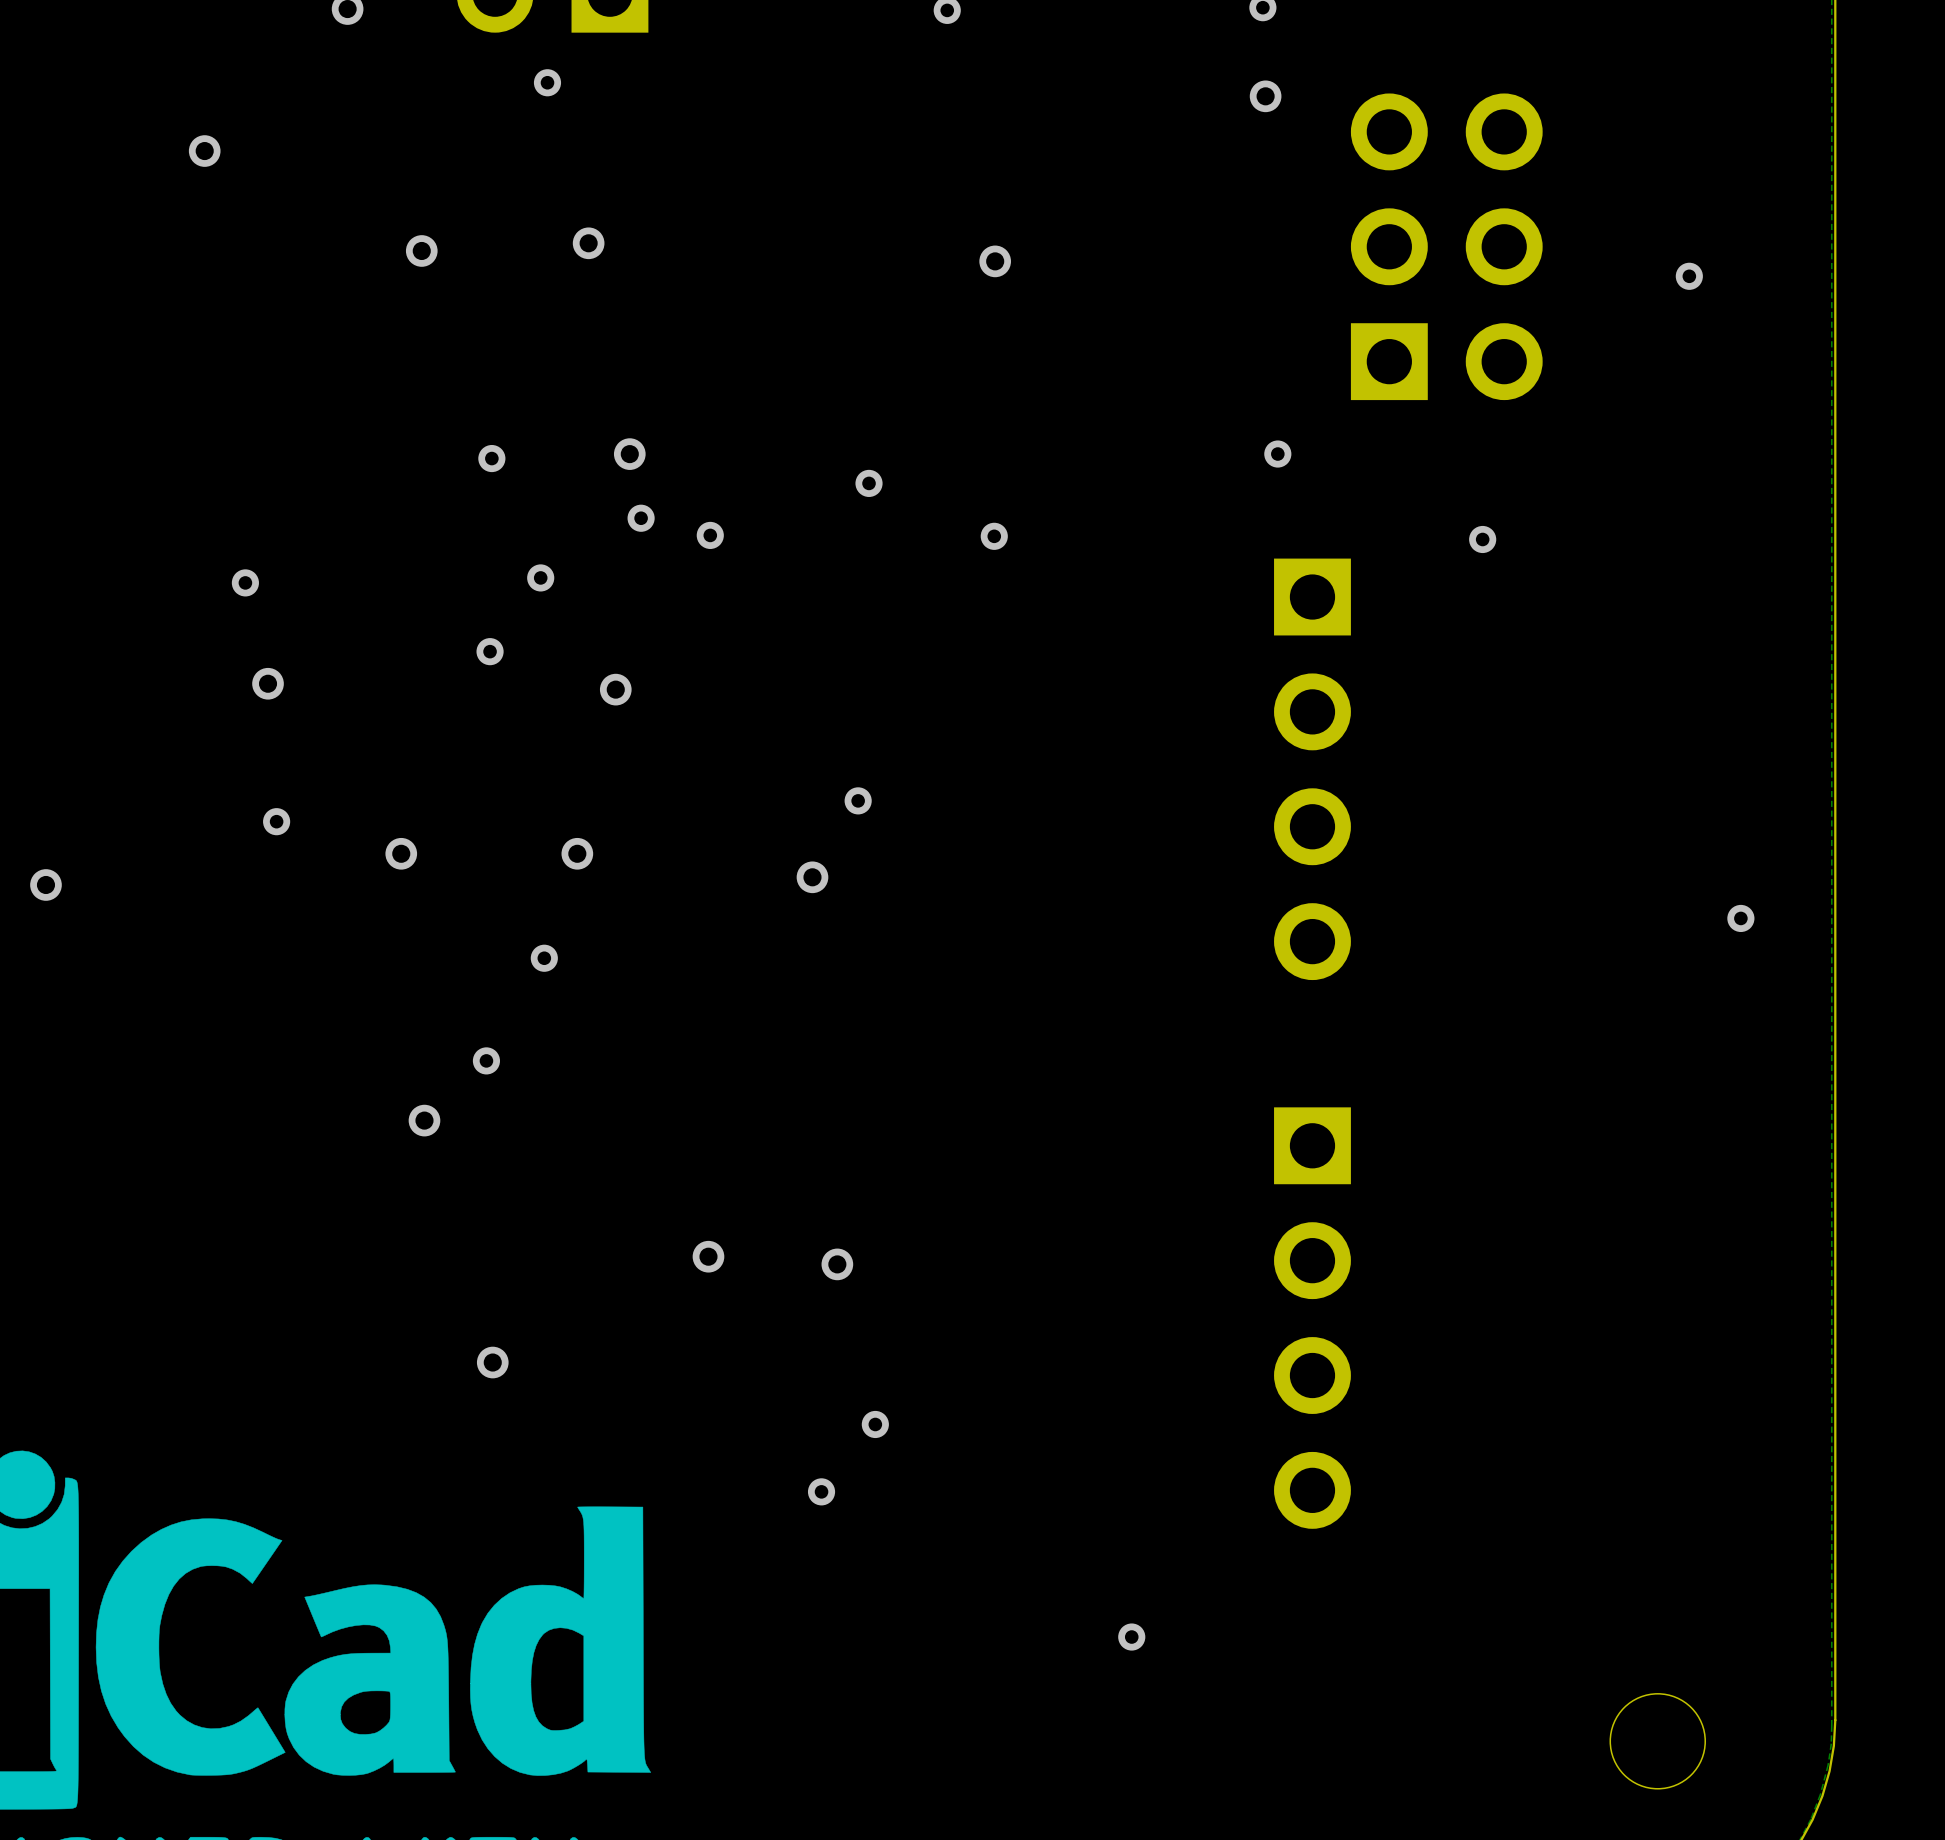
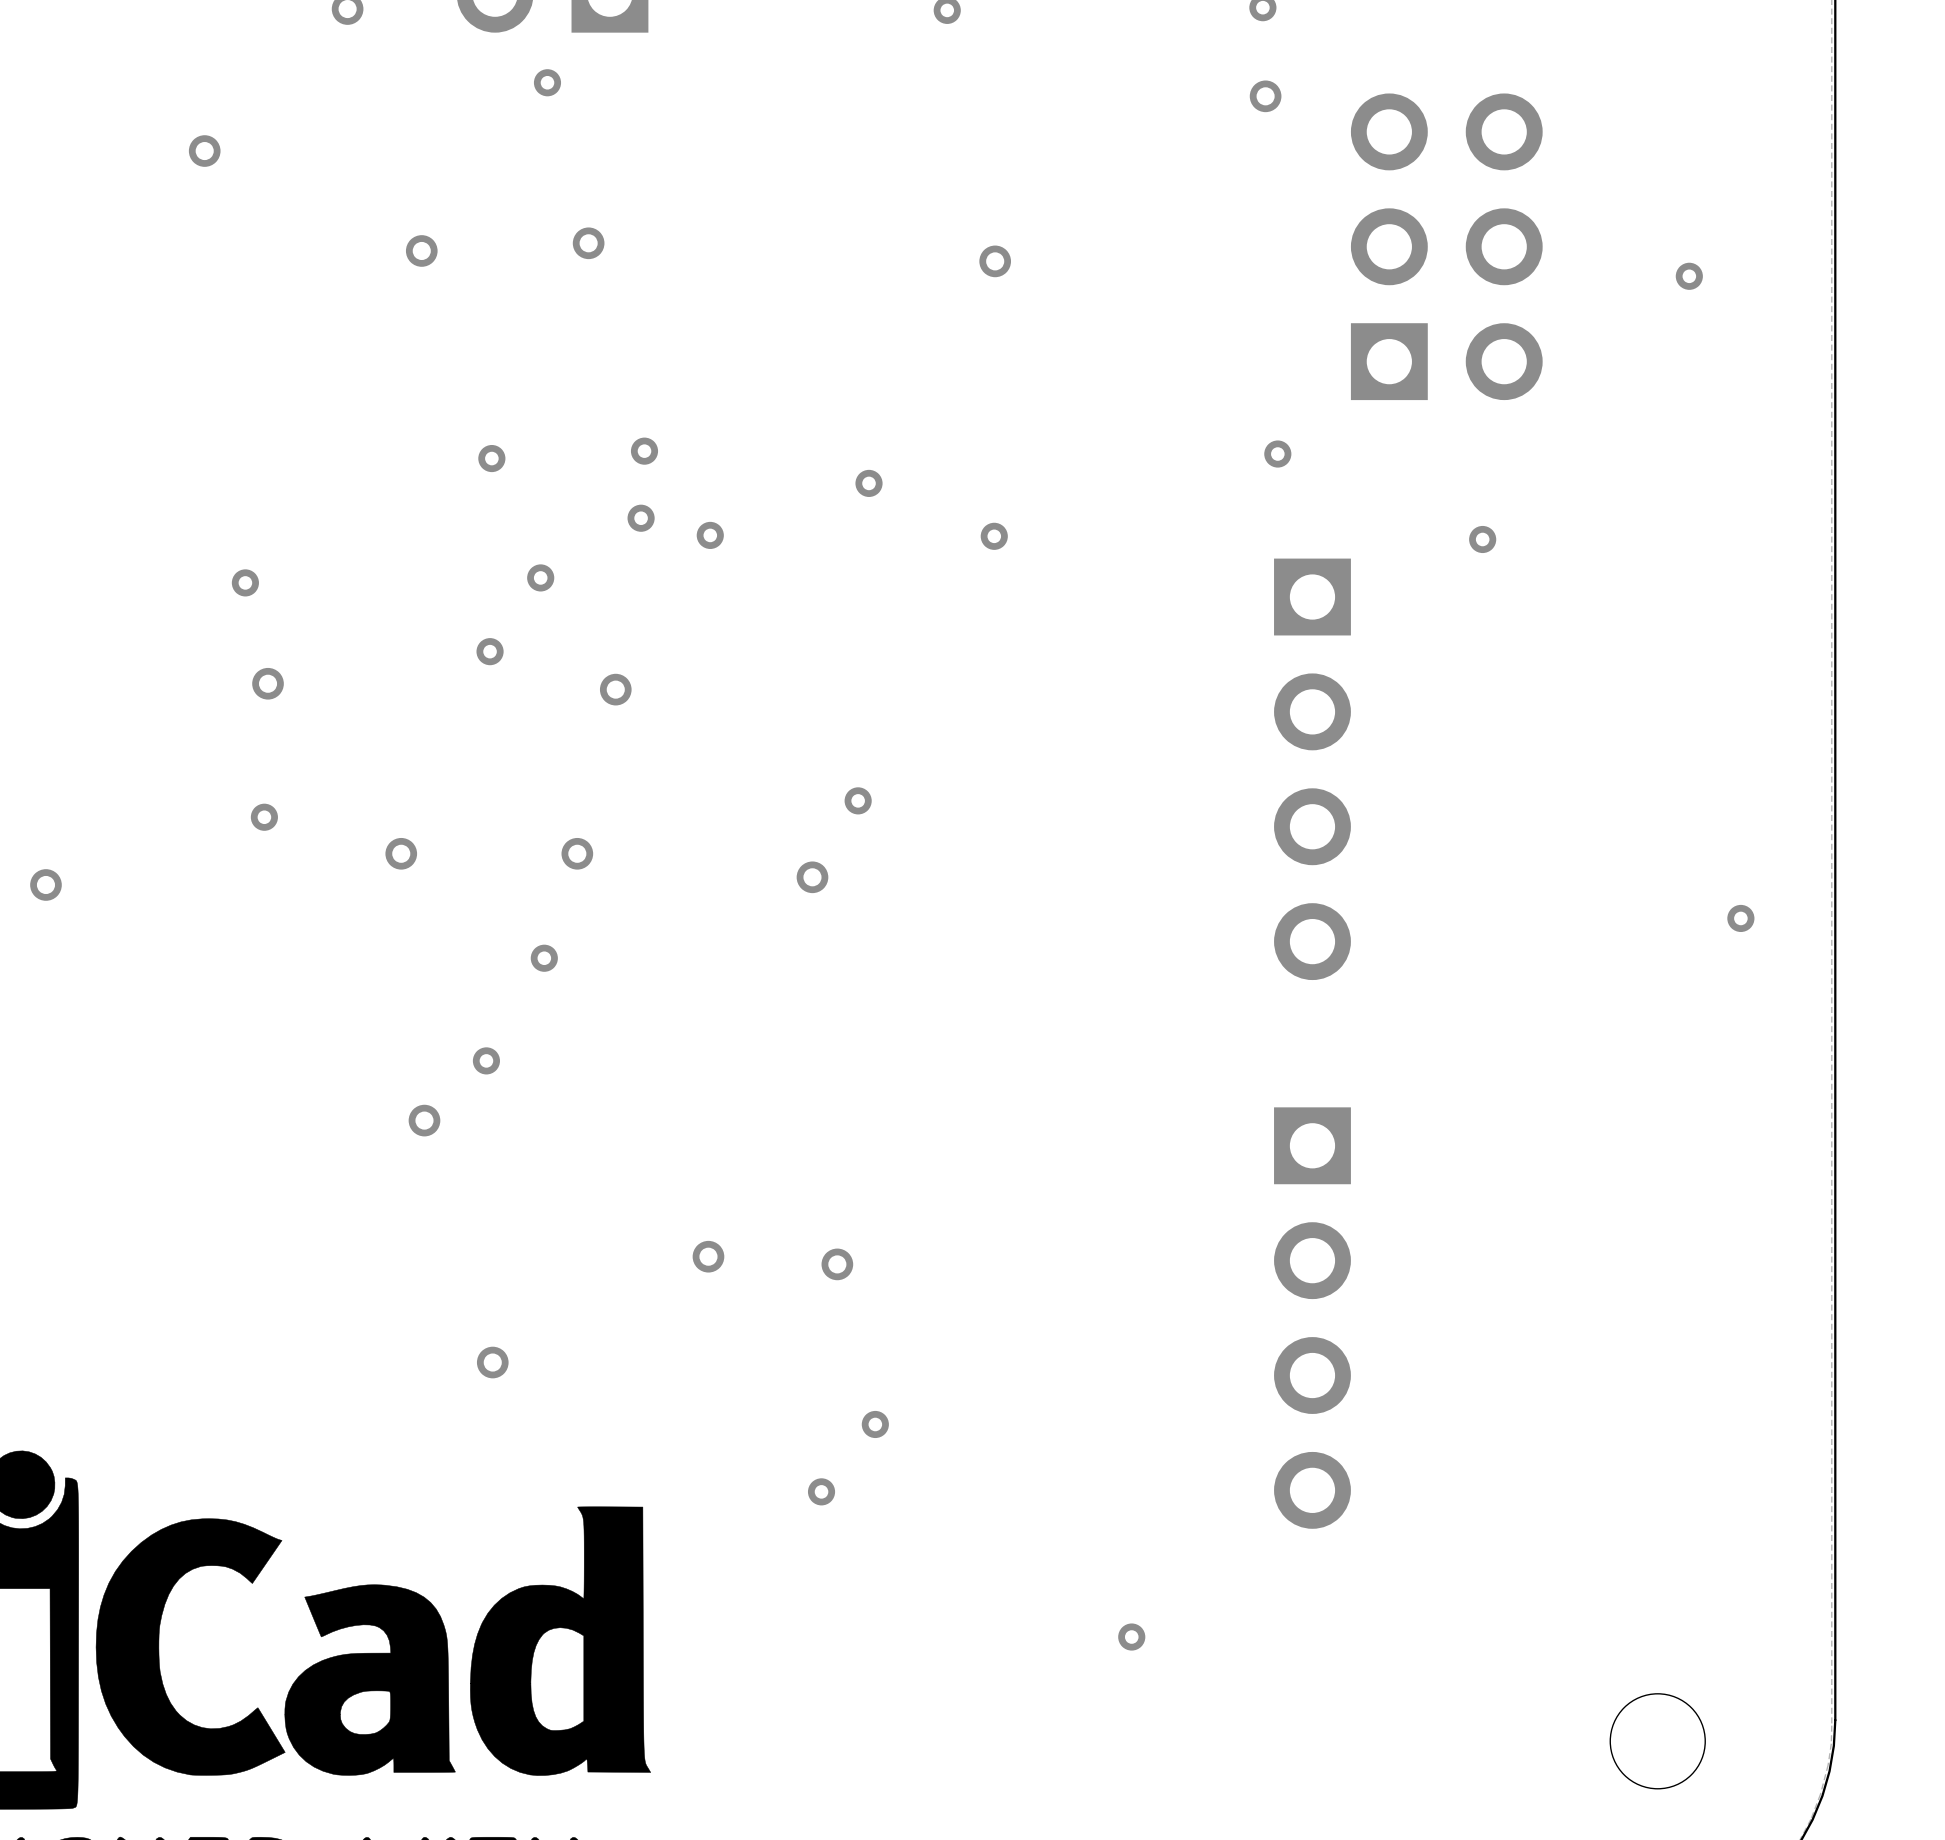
via position: (629, 454) -> (644, 451)
via position: (276, 821) -> (264, 817)

